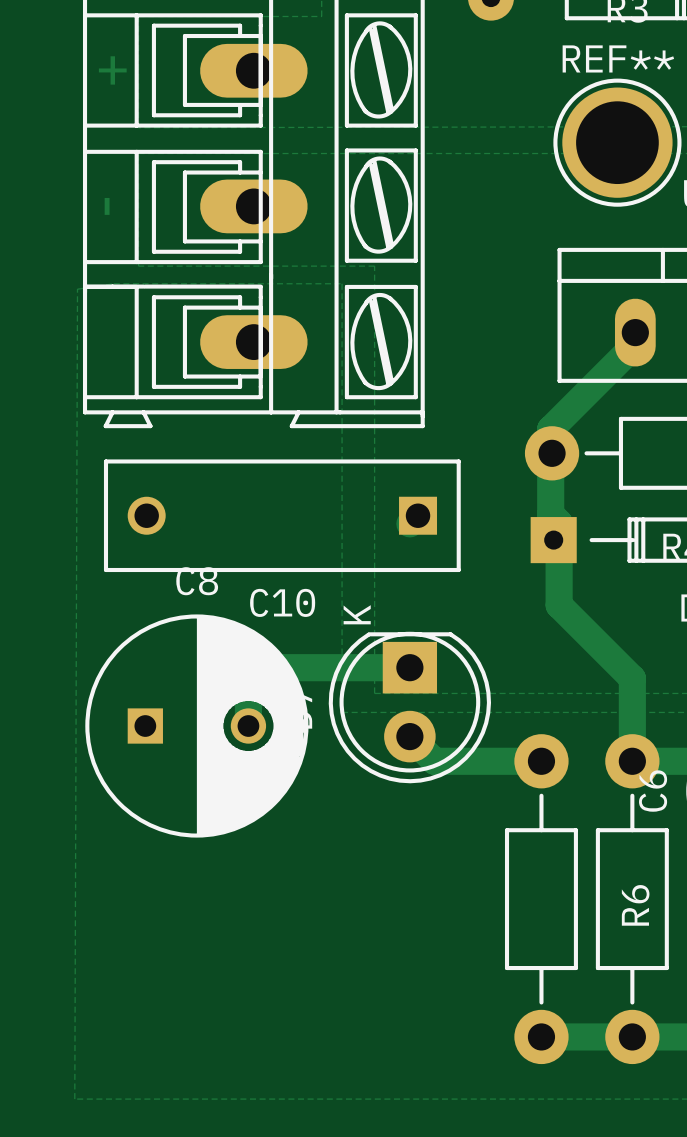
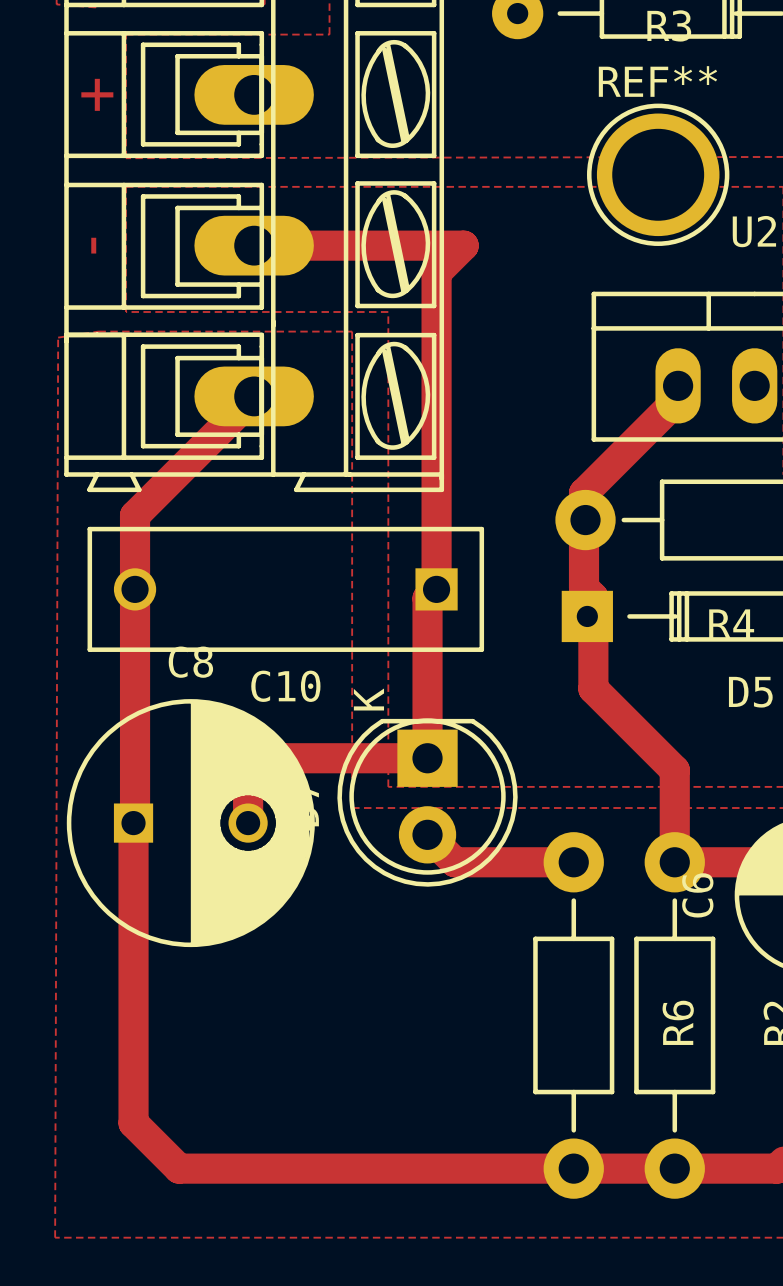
track: none -> (254, 245) (463, 245) (436, 272) (436, 589)
track: none -> (254, 396) (135, 515) (135, 821)
track: none -> (427, 598) (427, 758)
track: none -> (133, 823) (133, 1123) (179, 1168) (573, 1168)

